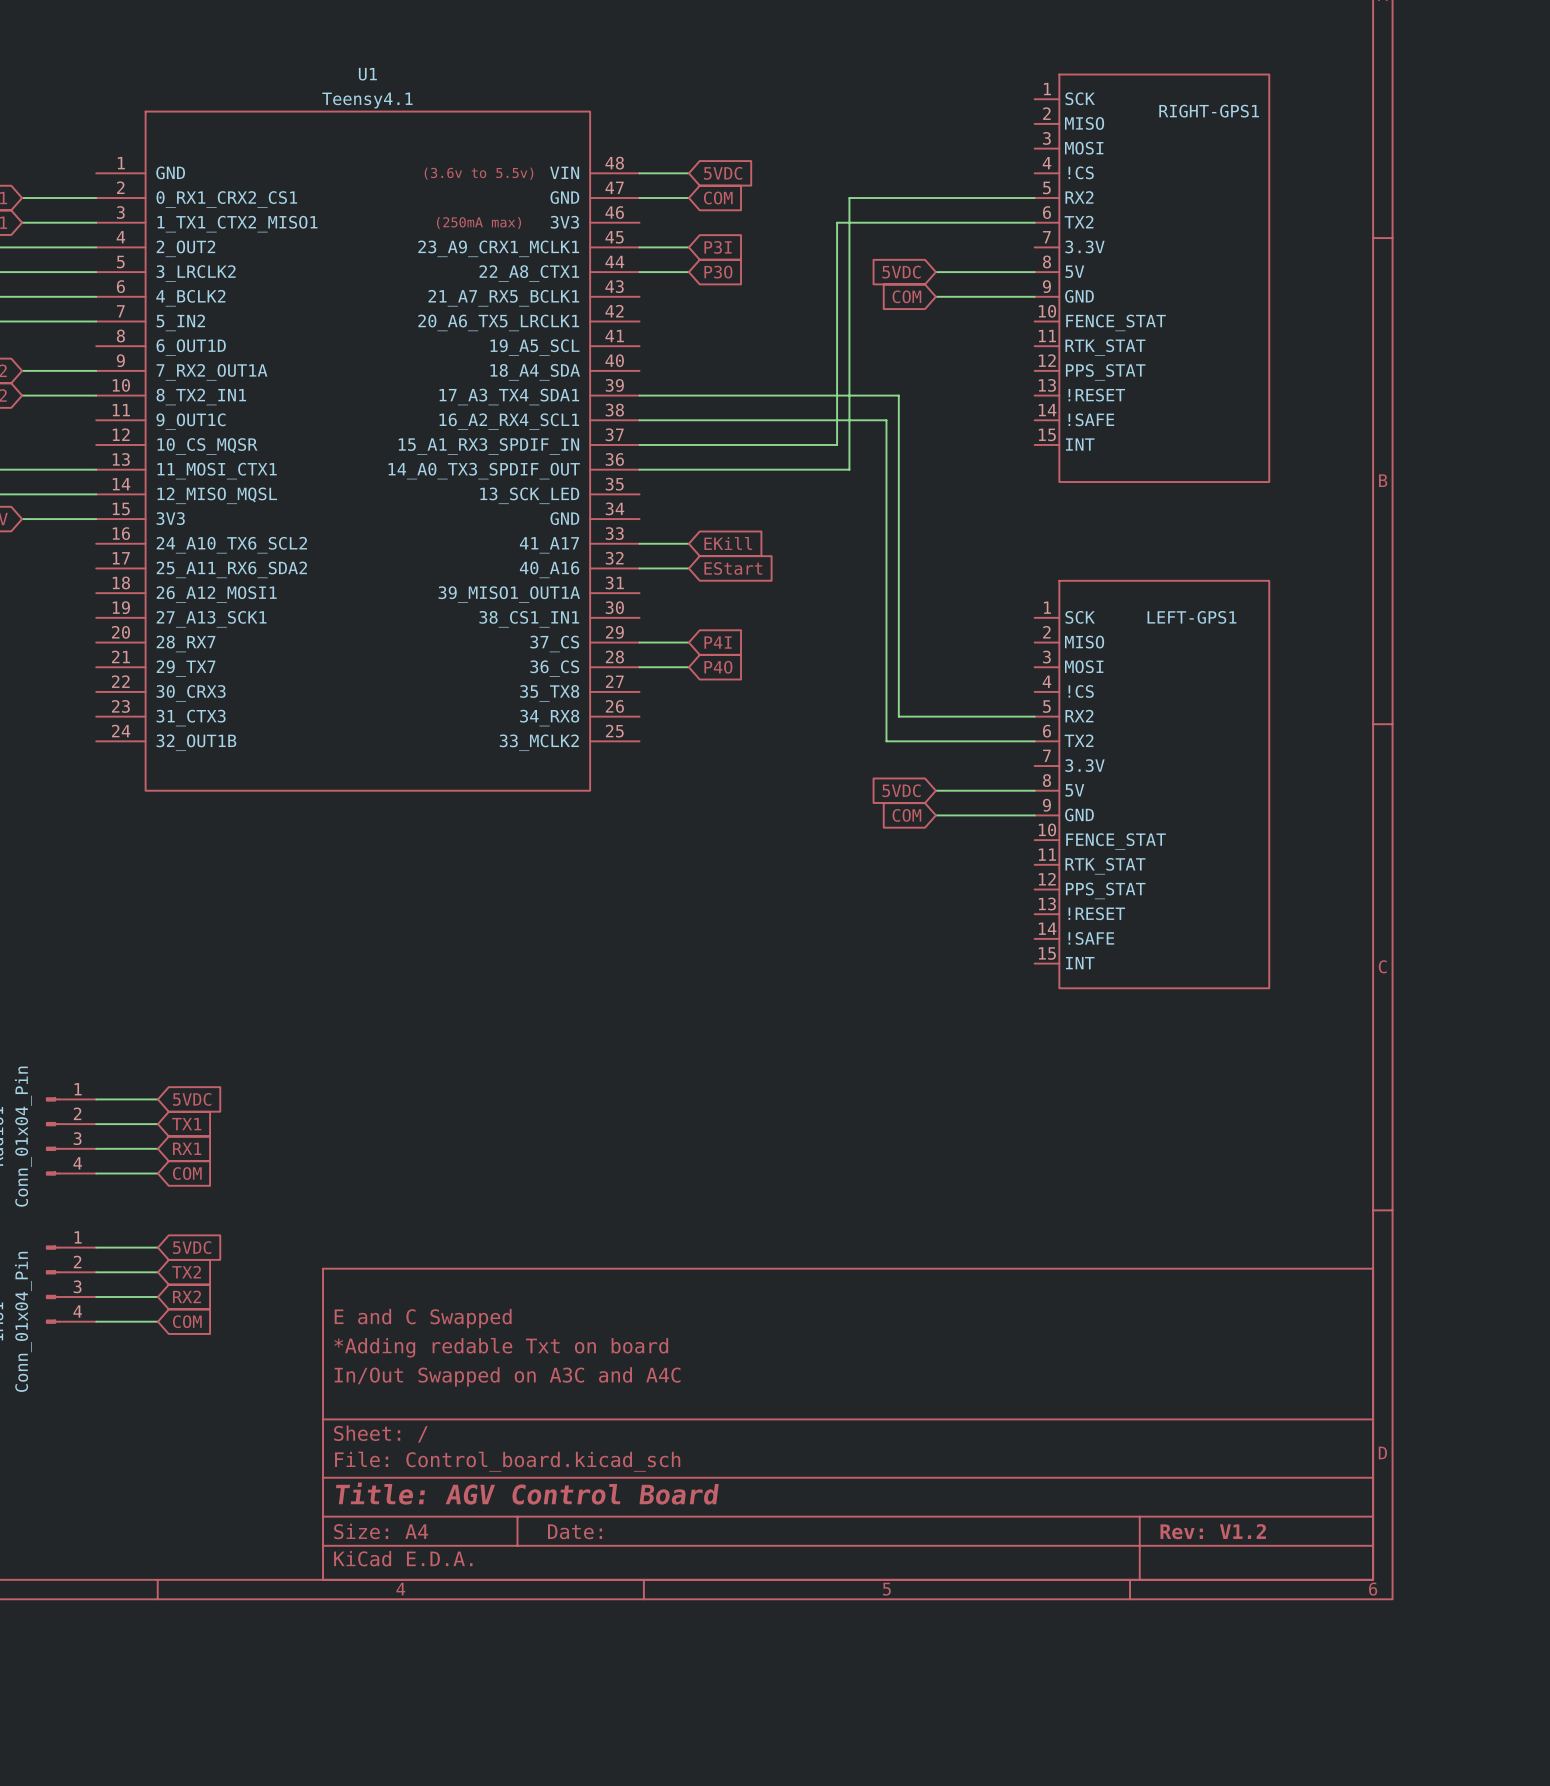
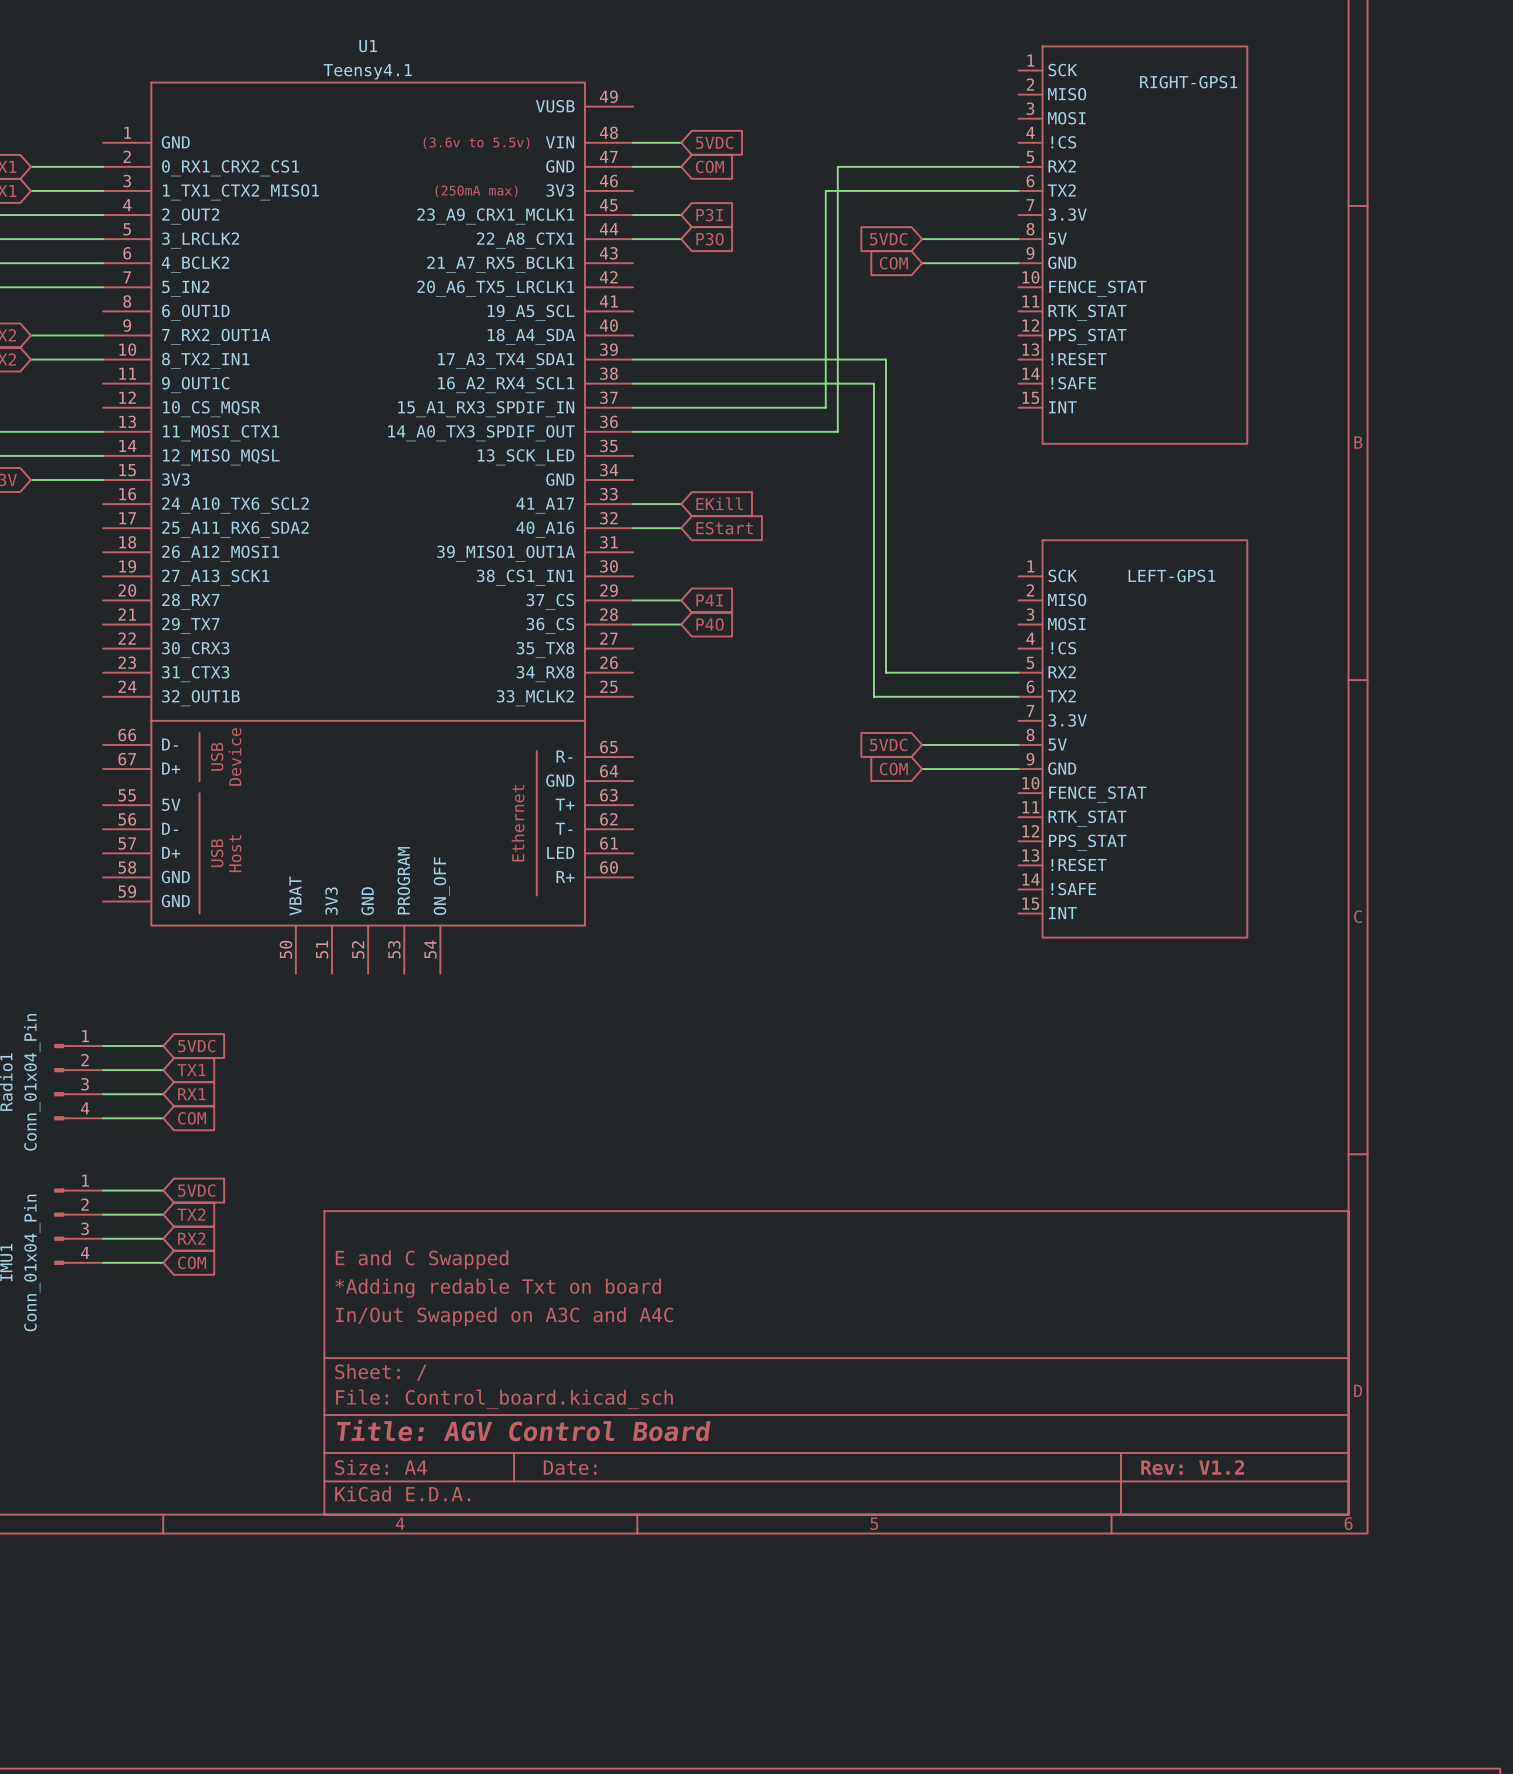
U1 symbol: [96, 111, 640, 791] -> [103, 82, 634, 974]

